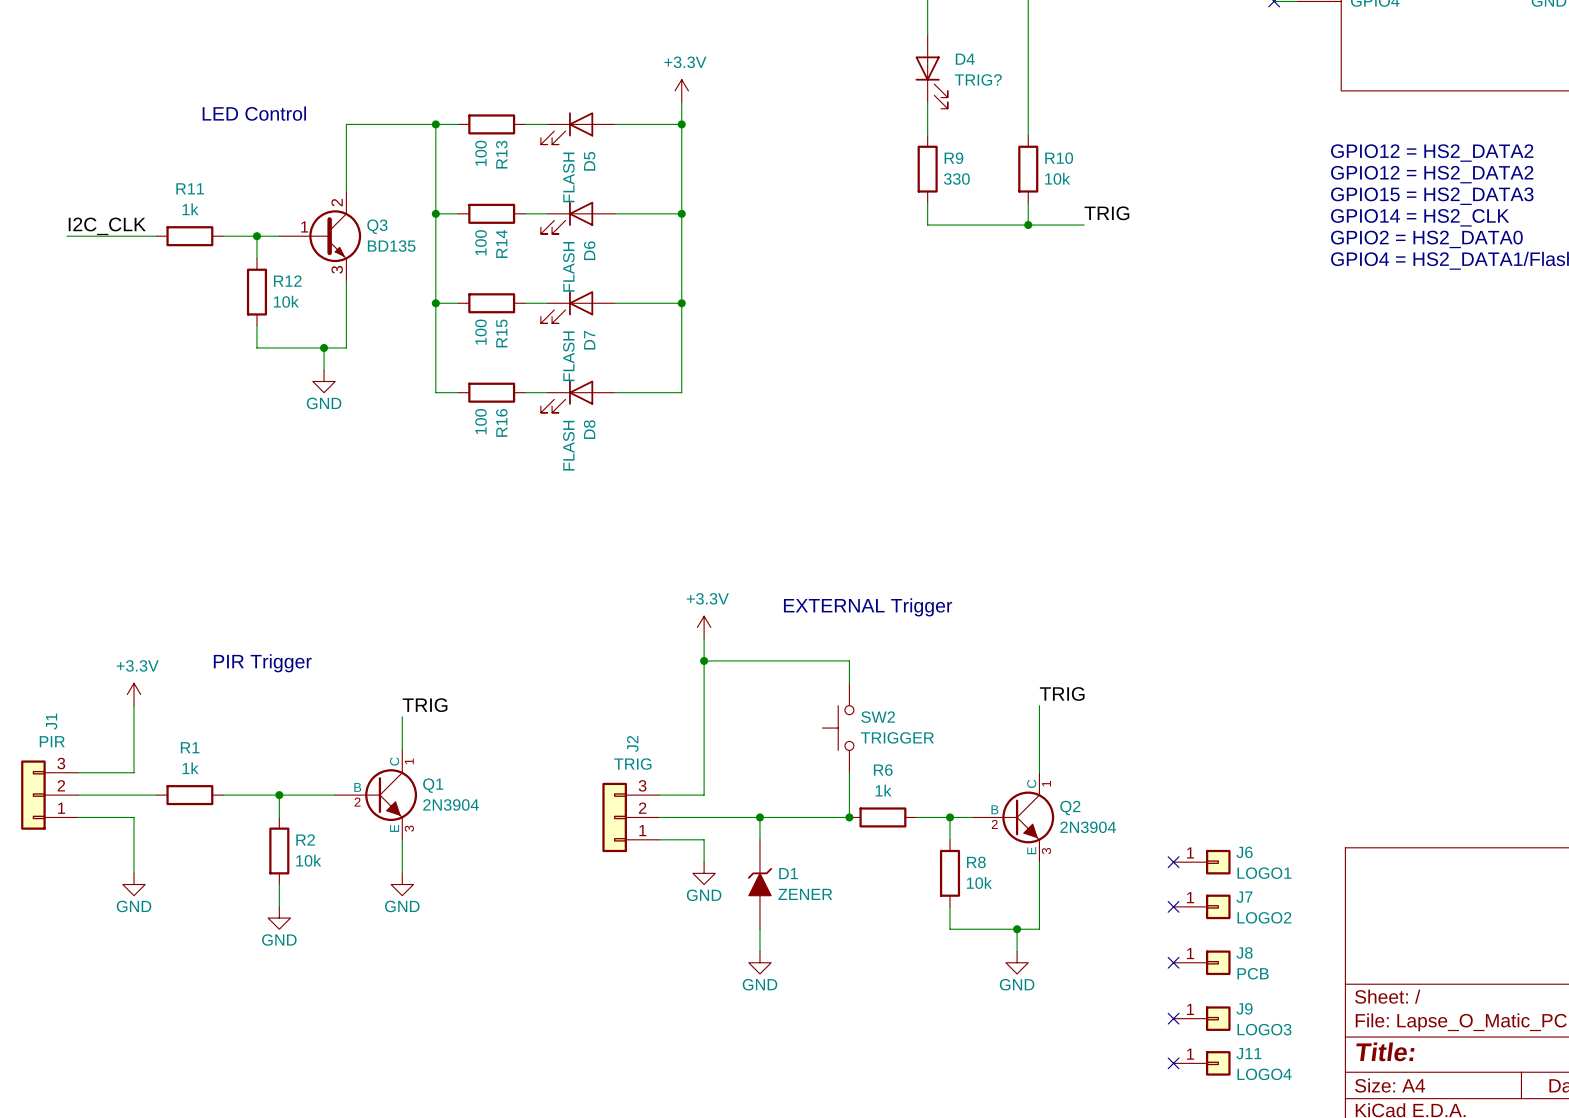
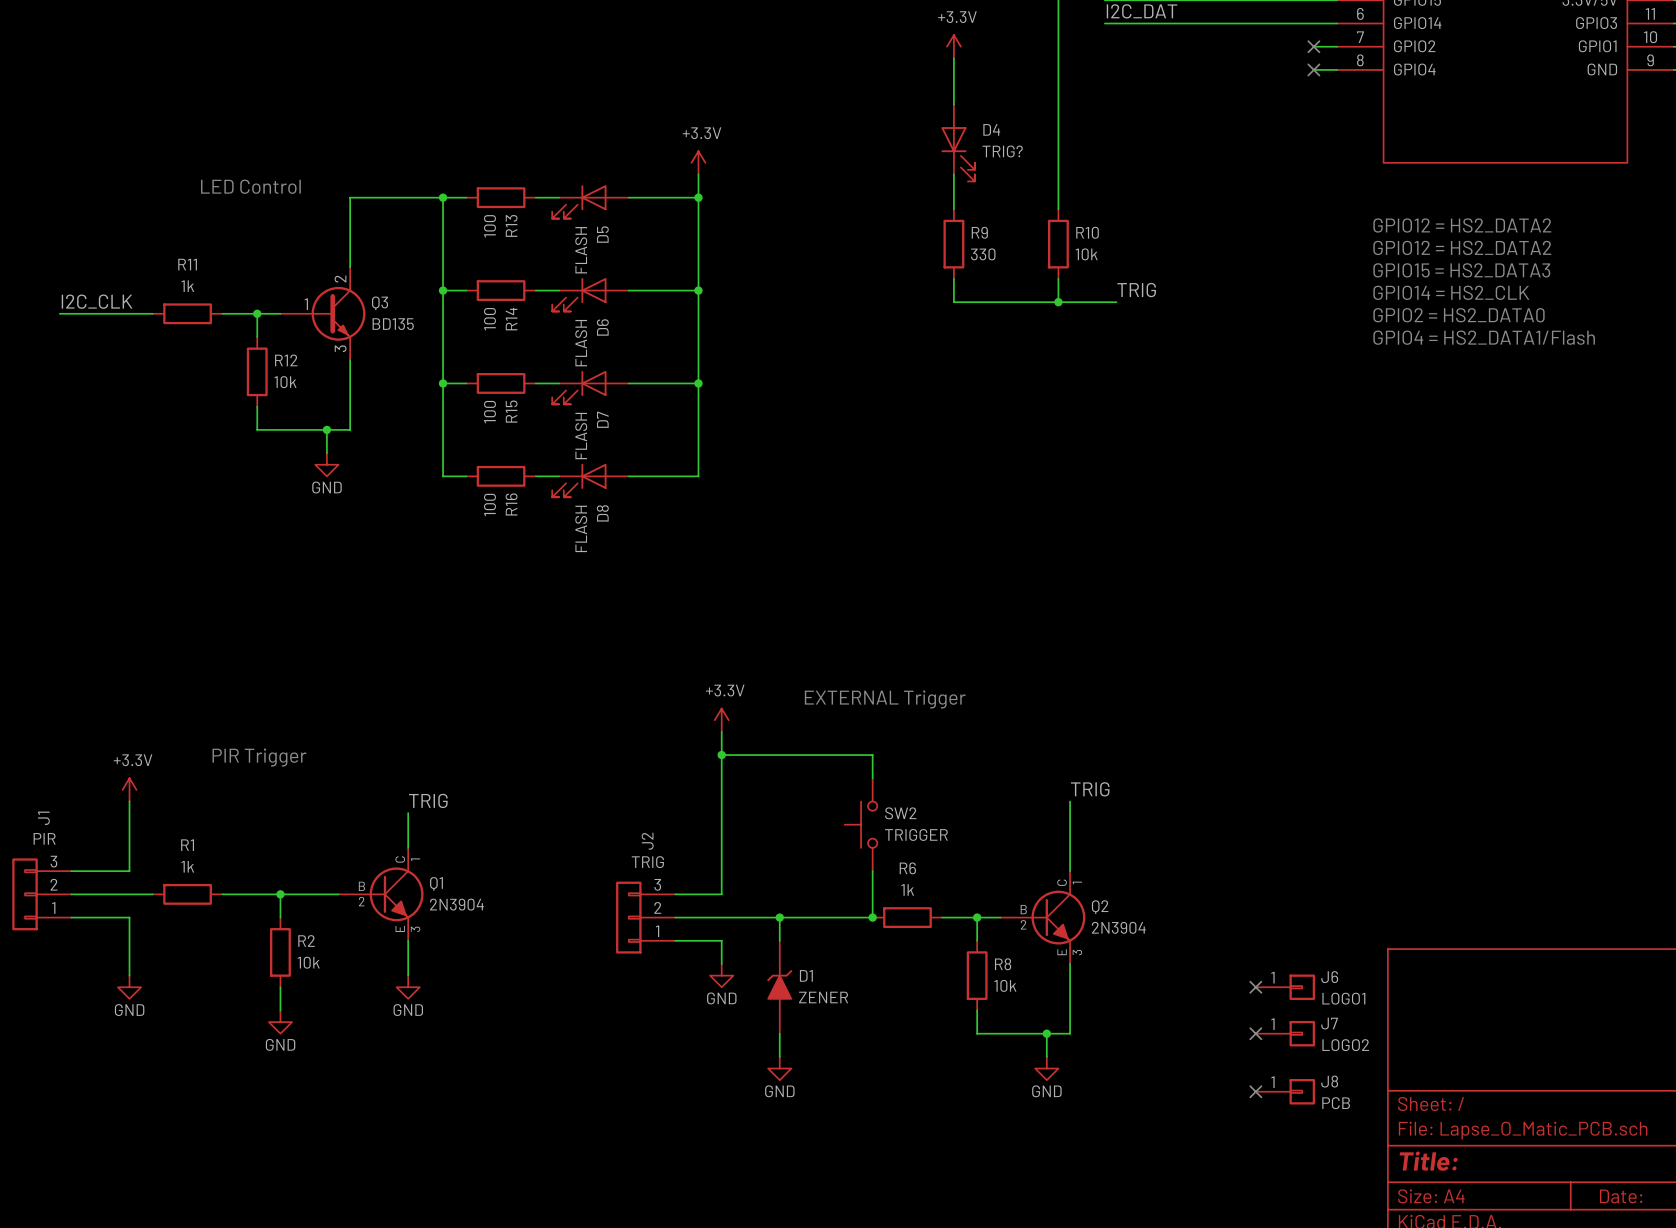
no-connect mark: (1173, 862) -> none
J6 position: (1202, 862) -> (1285, 987)
no-connect mark: none -> (1255, 987)
no-connect mark: (1173, 906) -> none
J7 position: (1202, 906) -> (1285, 1033)
no-connect mark: none -> (1255, 1033)
no-connect mark: (1173, 962) -> none
J8 position: (1202, 962) -> (1285, 1091)
no-connect mark: none -> (1255, 1091)
no-connect mark: (1173, 1018) -> none
J9: LOGO3 (1202, 1018) -> none
no-connect mark: (1173, 1063) -> none
J11: LOGO4 (1202, 1063) -> none

